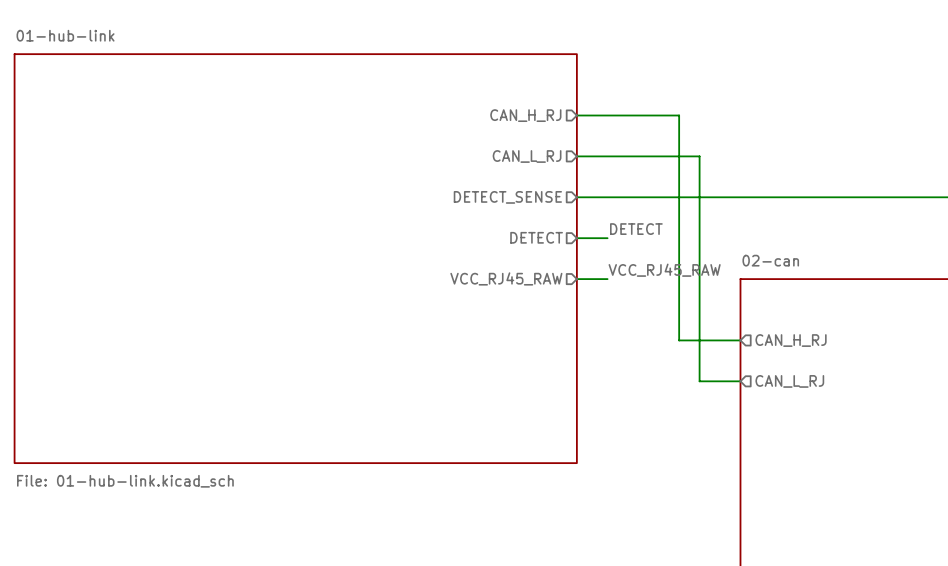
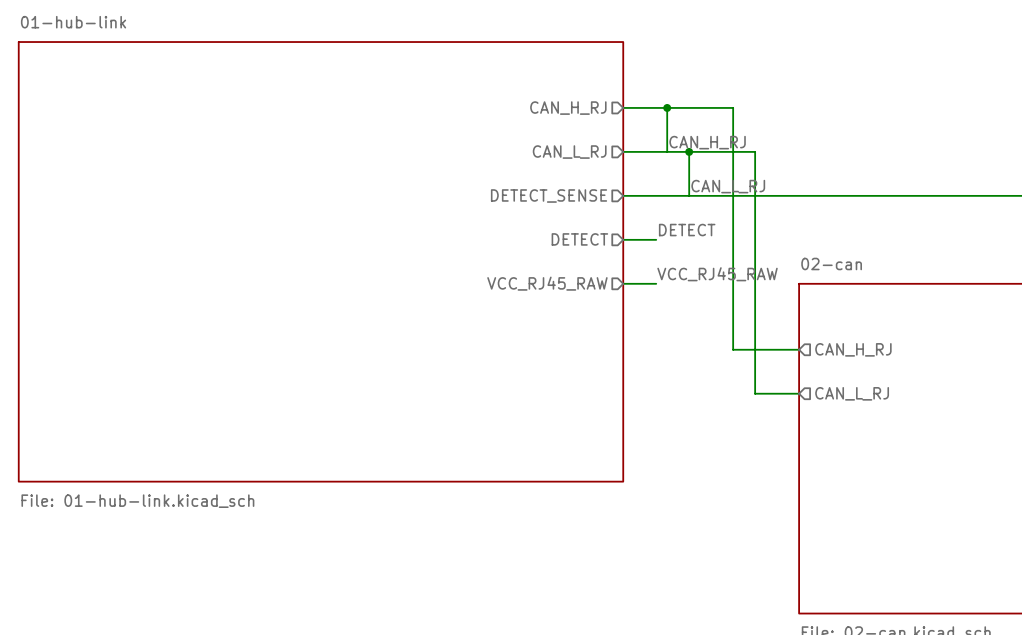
wire: none -> (667, 107) (667, 151)
junction: none -> (667, 107)
label: none -> CAN_H_RJ (707, 142)
wire: none -> (689, 151) (689, 195)
junction: none -> (689, 151)
label: none -> CAN_L_RJ (728, 186)

